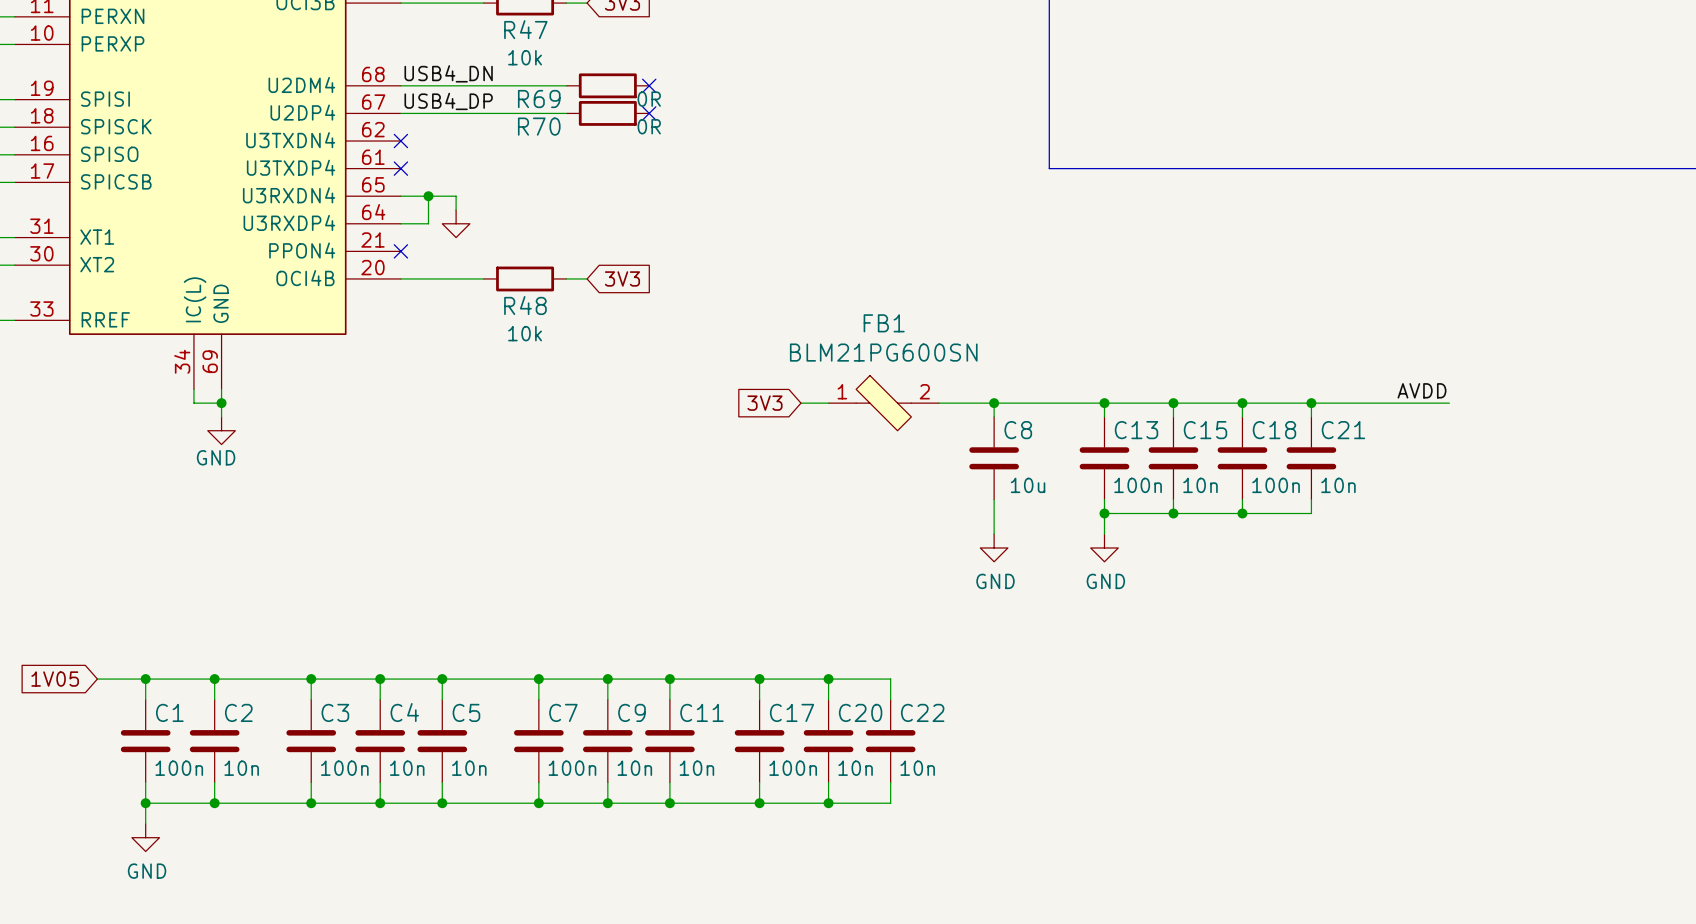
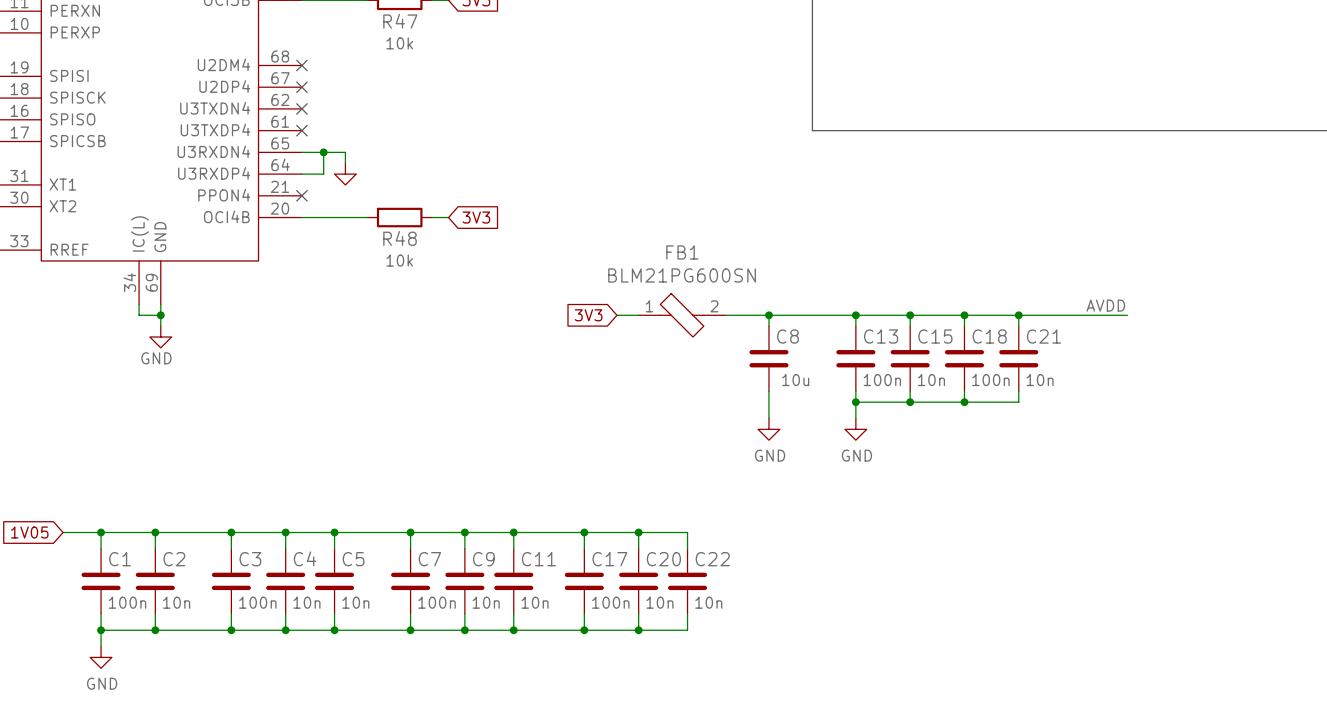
label: USB4_DN (448, 73) -> none
wire: (400, 85) (566, 85) -> none
no-connect mark: none -> (301, 65)
R69: (607, 85) -> none
no-connect mark: (649, 85) -> none
label: USB4_DP (448, 101) -> none
wire: (400, 113) (566, 113) -> none
no-connect mark: none -> (301, 87)
R70: (607, 113) -> none
no-connect mark: (649, 113) -> none

